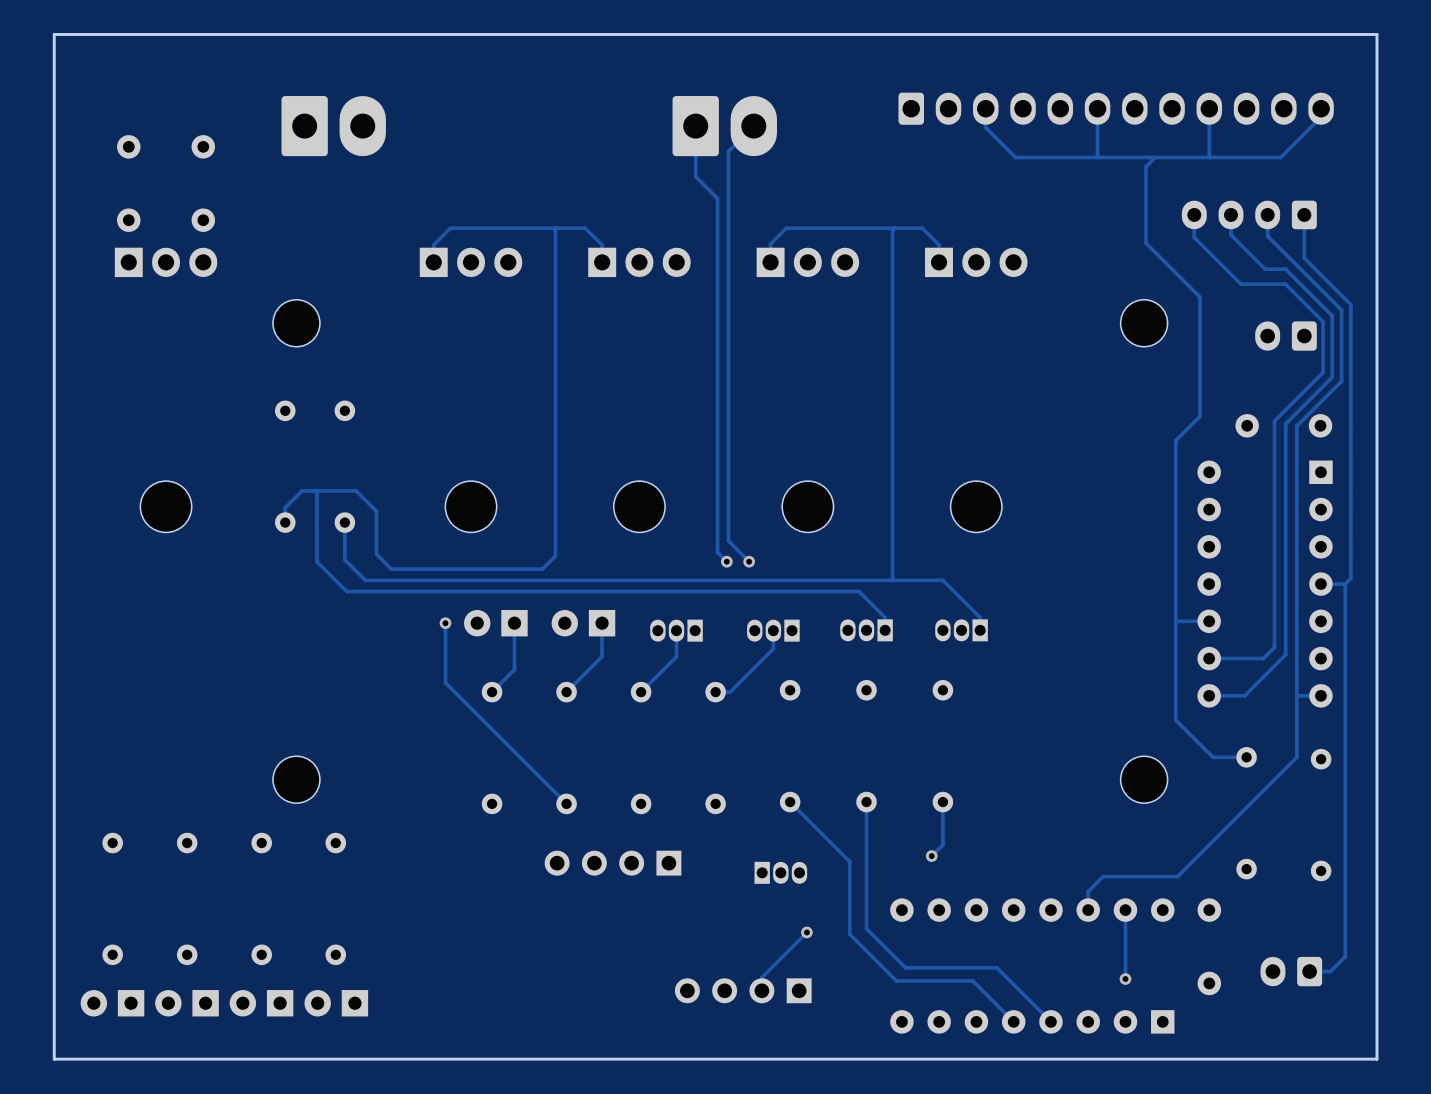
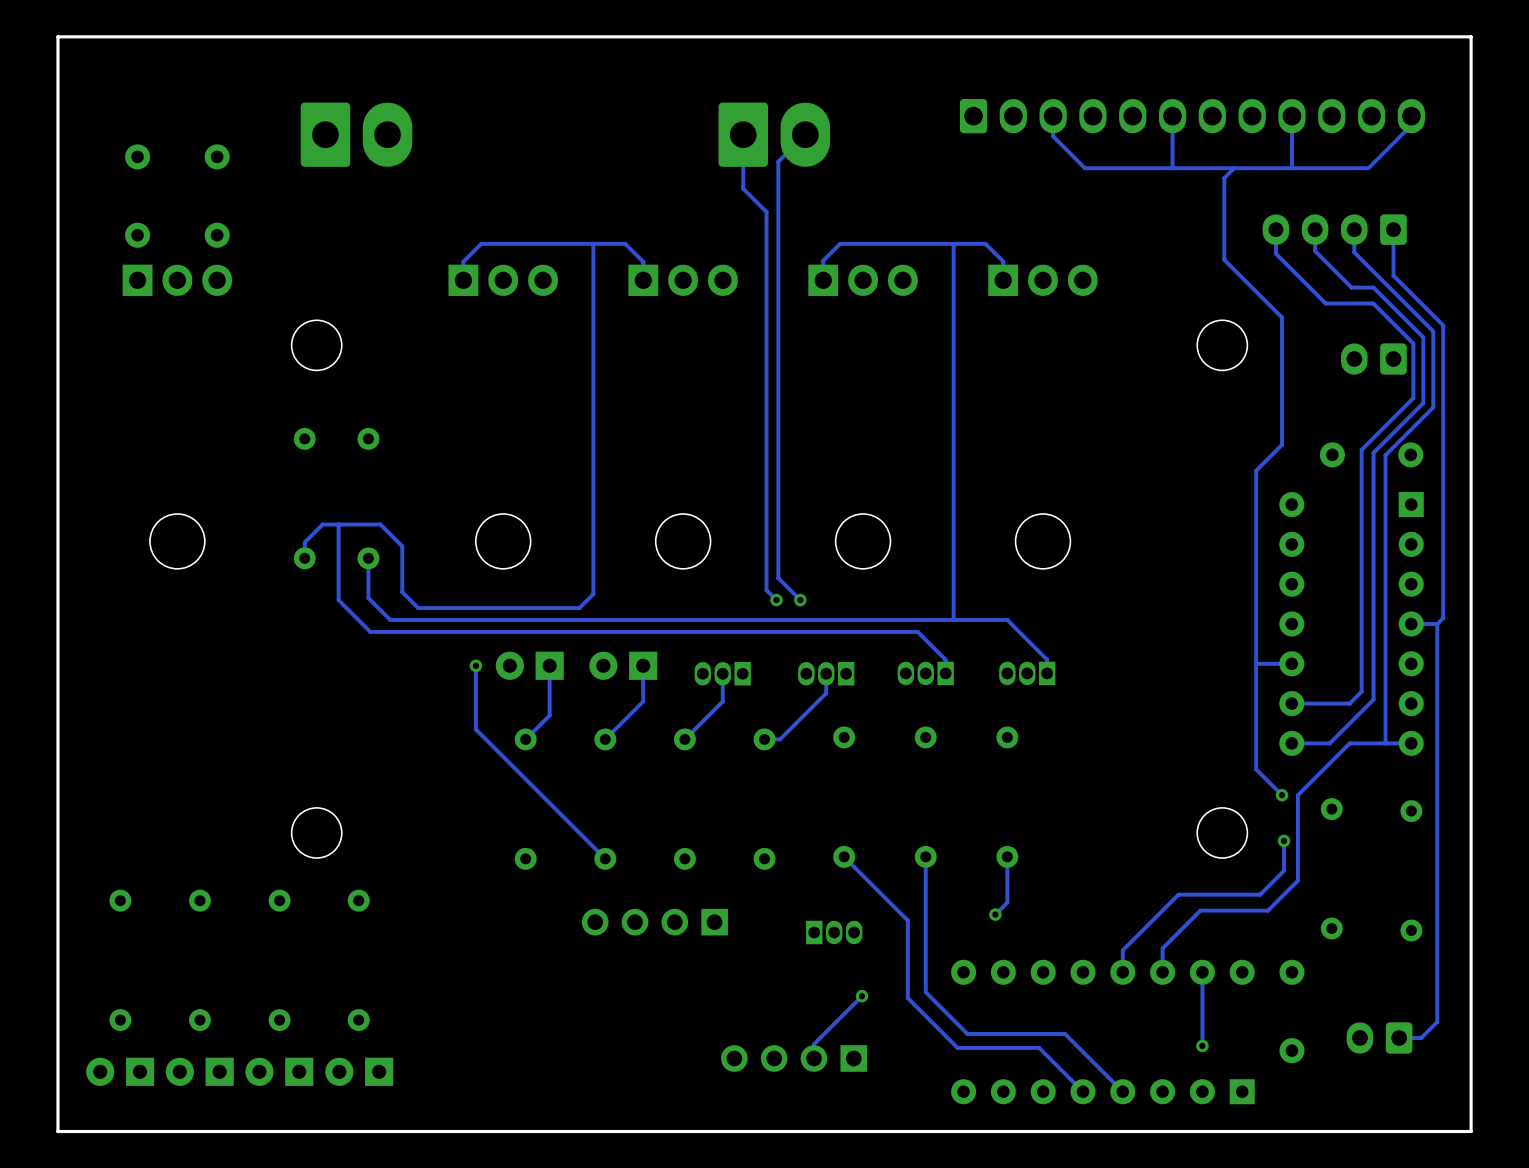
track: (1296, 695) (1296, 757) (1177, 876) (1103, 876) (1088, 891) -> (1385, 743) (1349, 743) (1297, 795) (1297, 880) (1268, 910) (1200, 910) (1162, 948) (1162, 952)
track: (1200, 744) (1213, 757) (1246, 757) -> none
via: none -> (1282, 795)
track: none -> (1284, 840) (1284, 870) (1260, 894) (1178, 894) (1122, 950) (1122, 972)
via: none -> (1284, 840)

